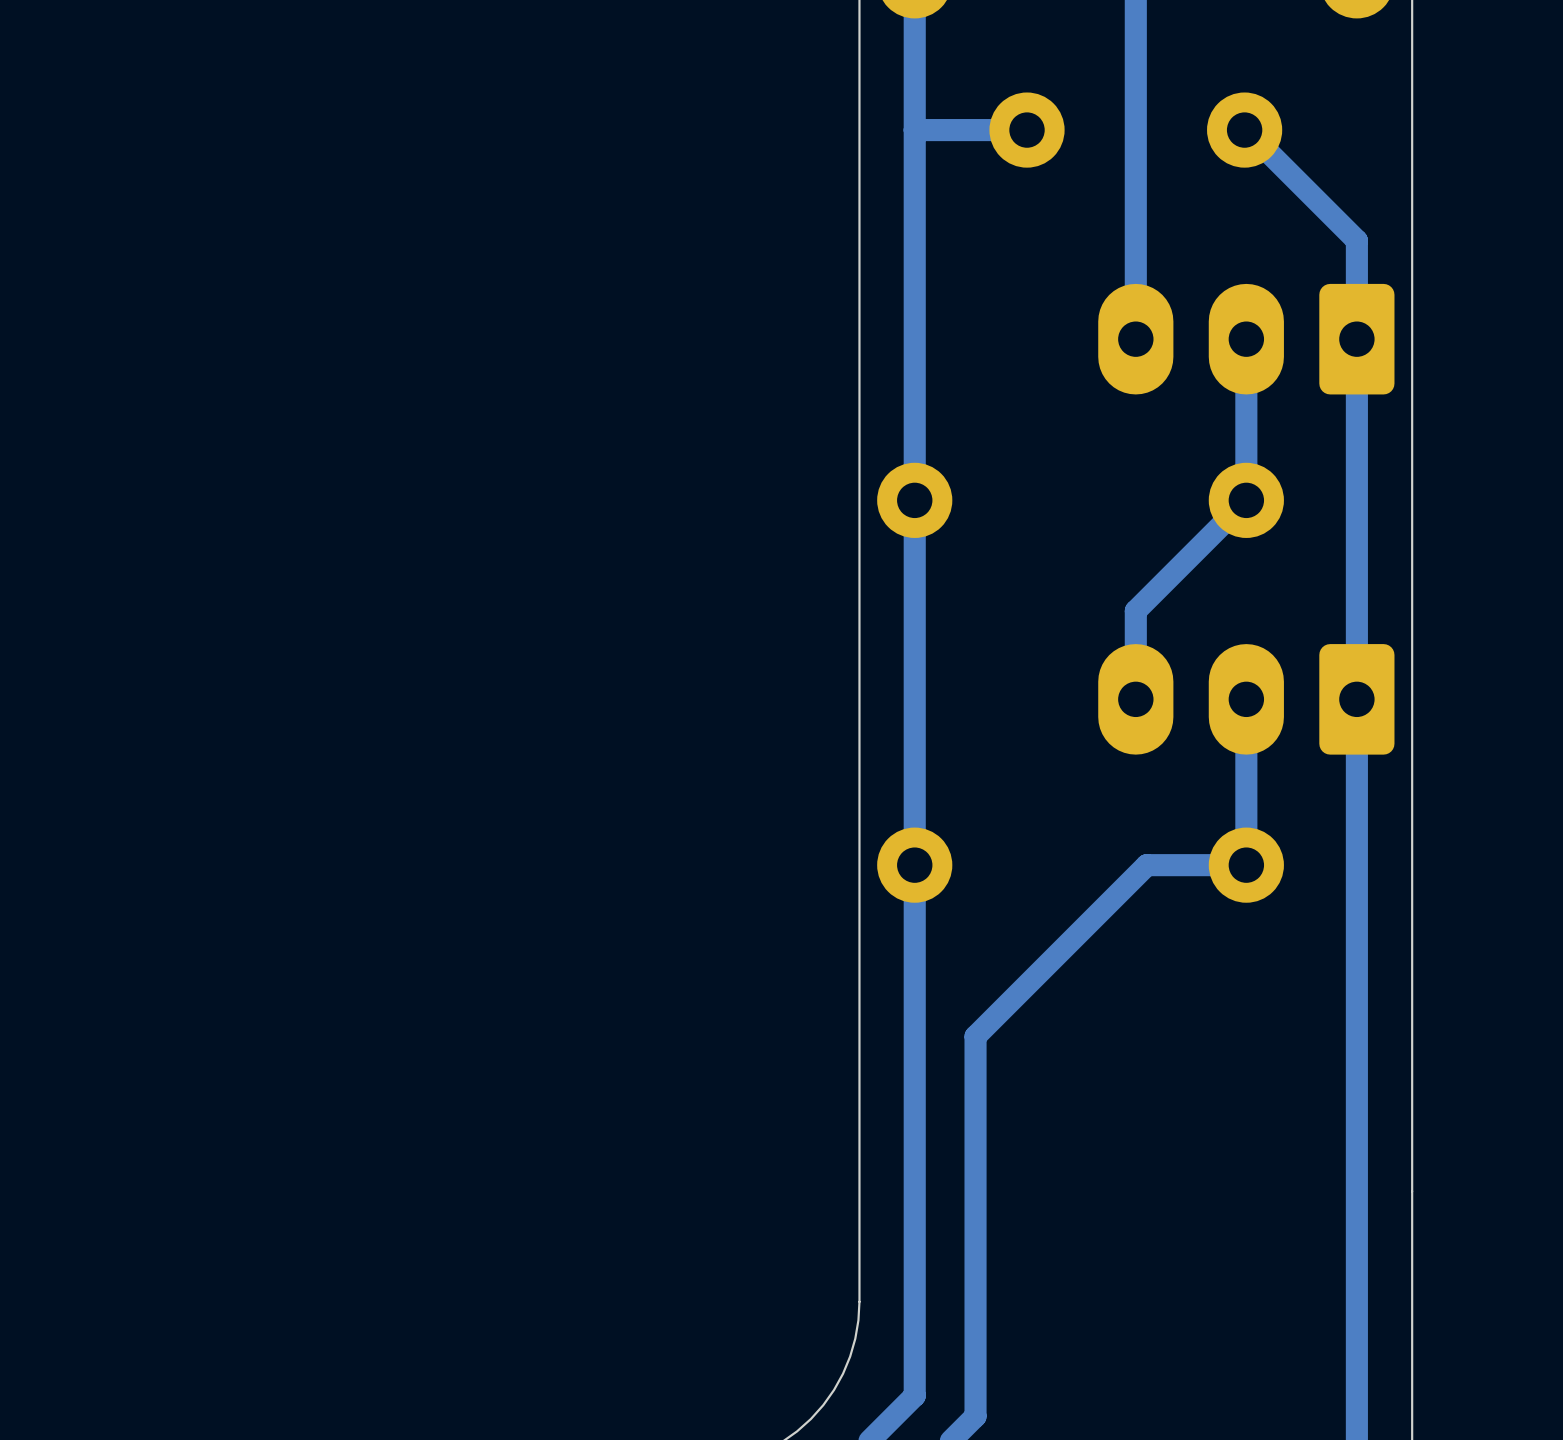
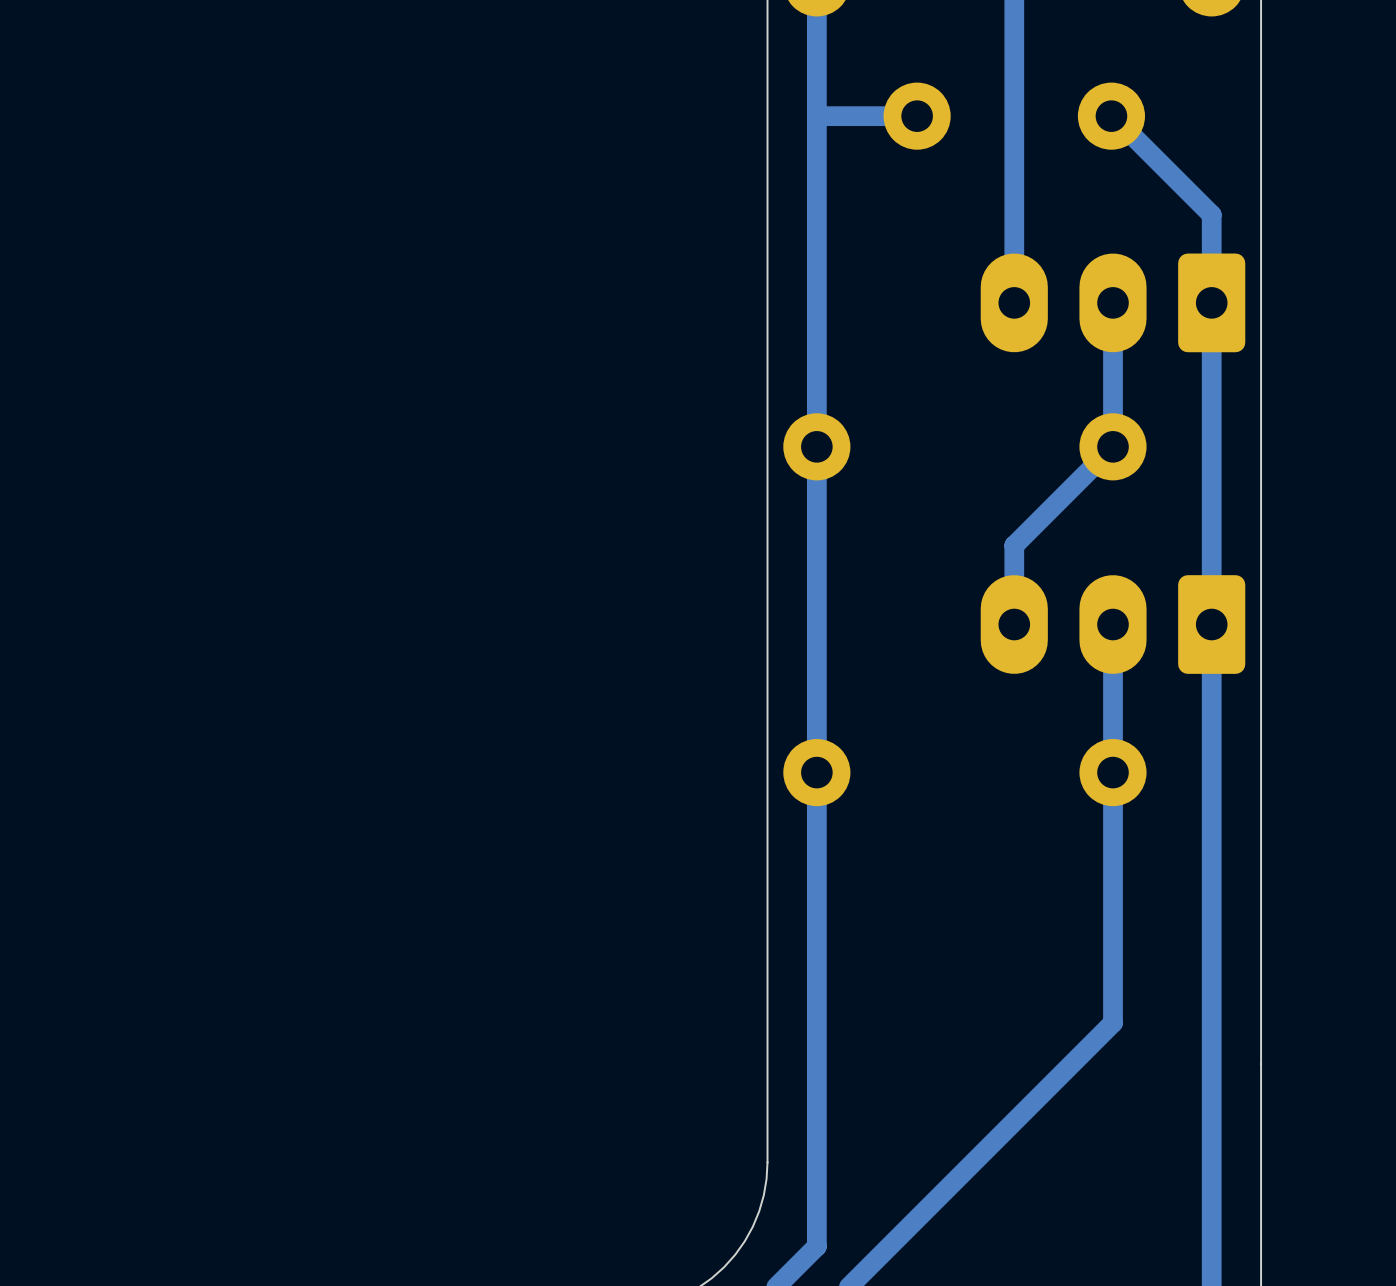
bottom track: (1246, 865) (1146, 865) (975, 1036) (975, 1416) -> (1113, 772) (1113, 1022) (871, 1264)

